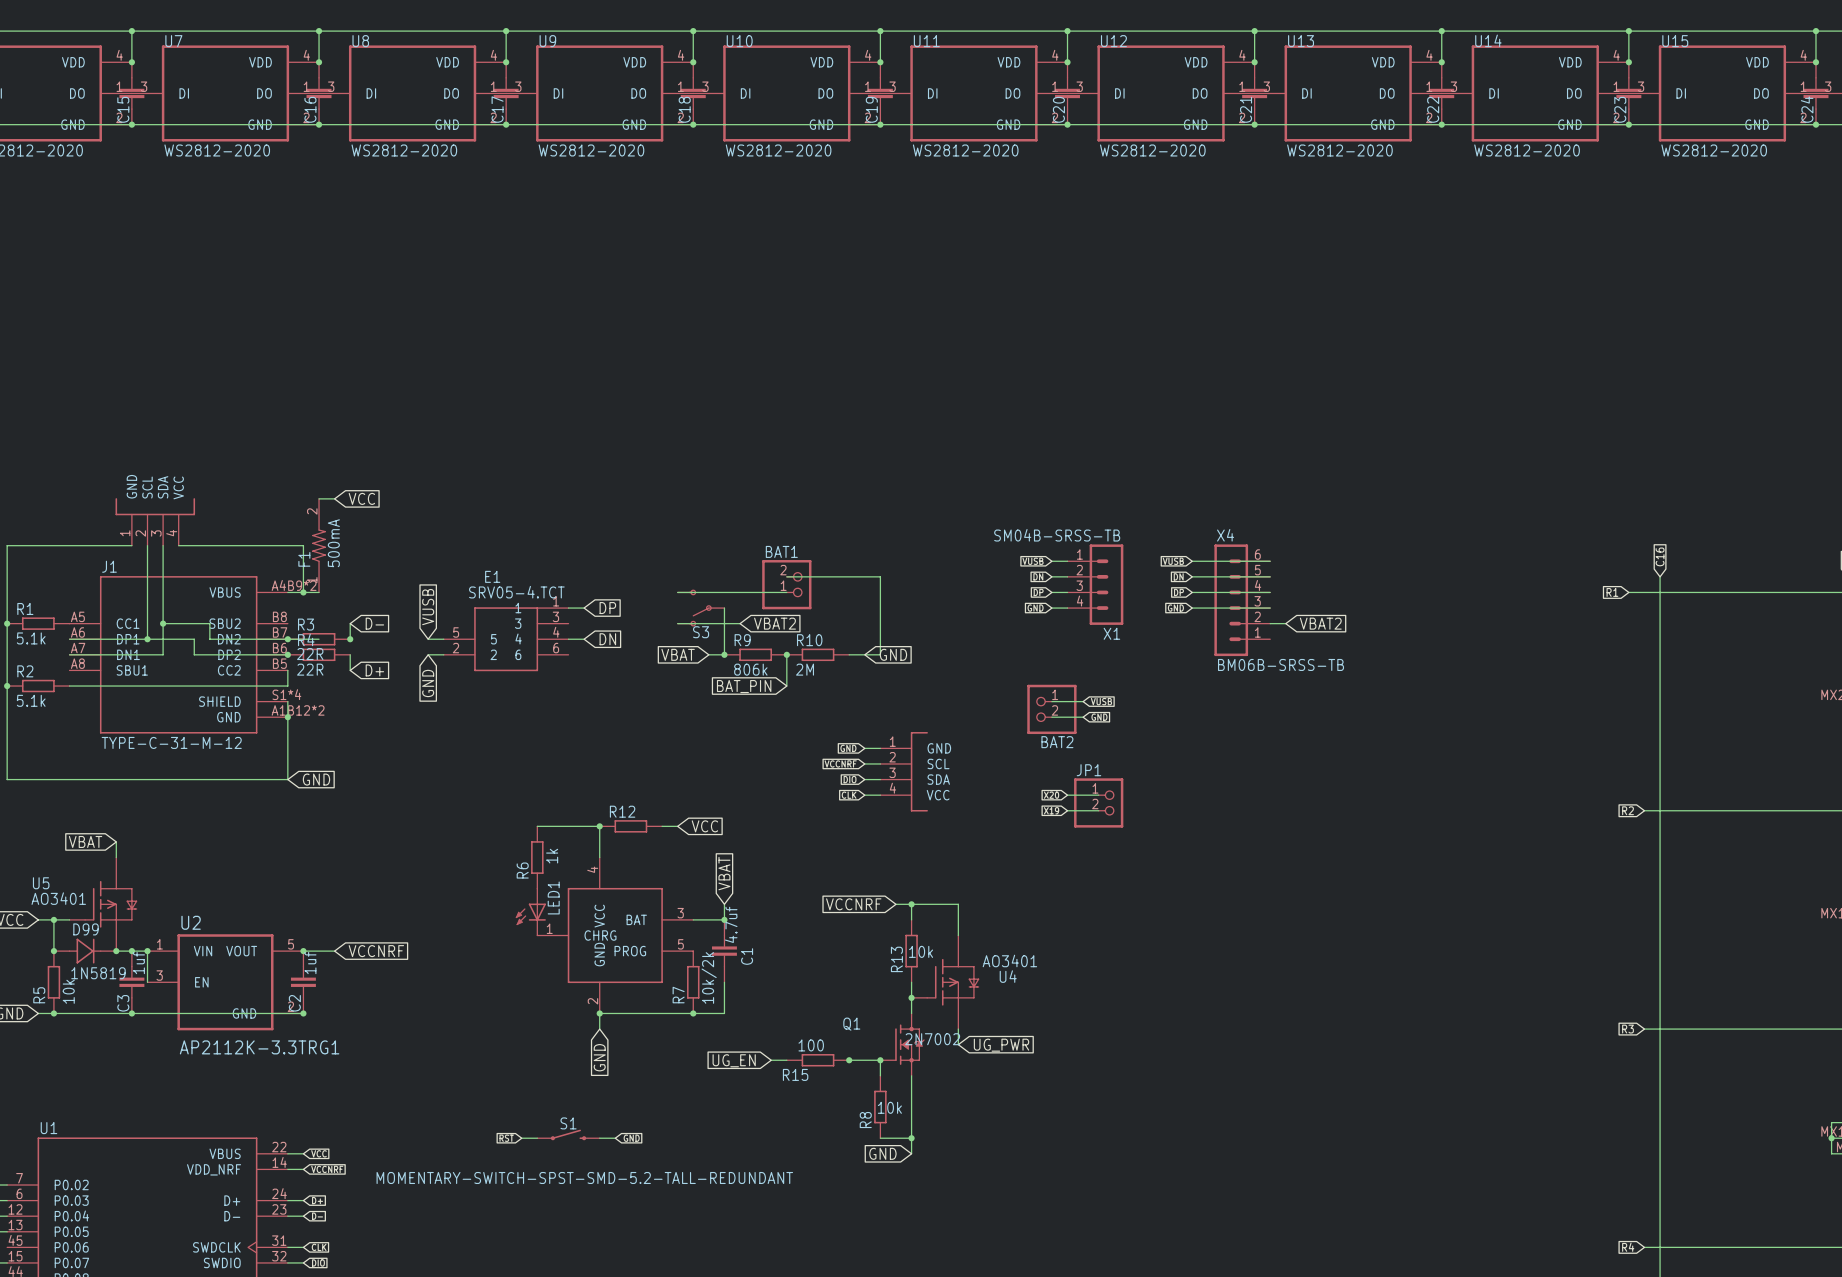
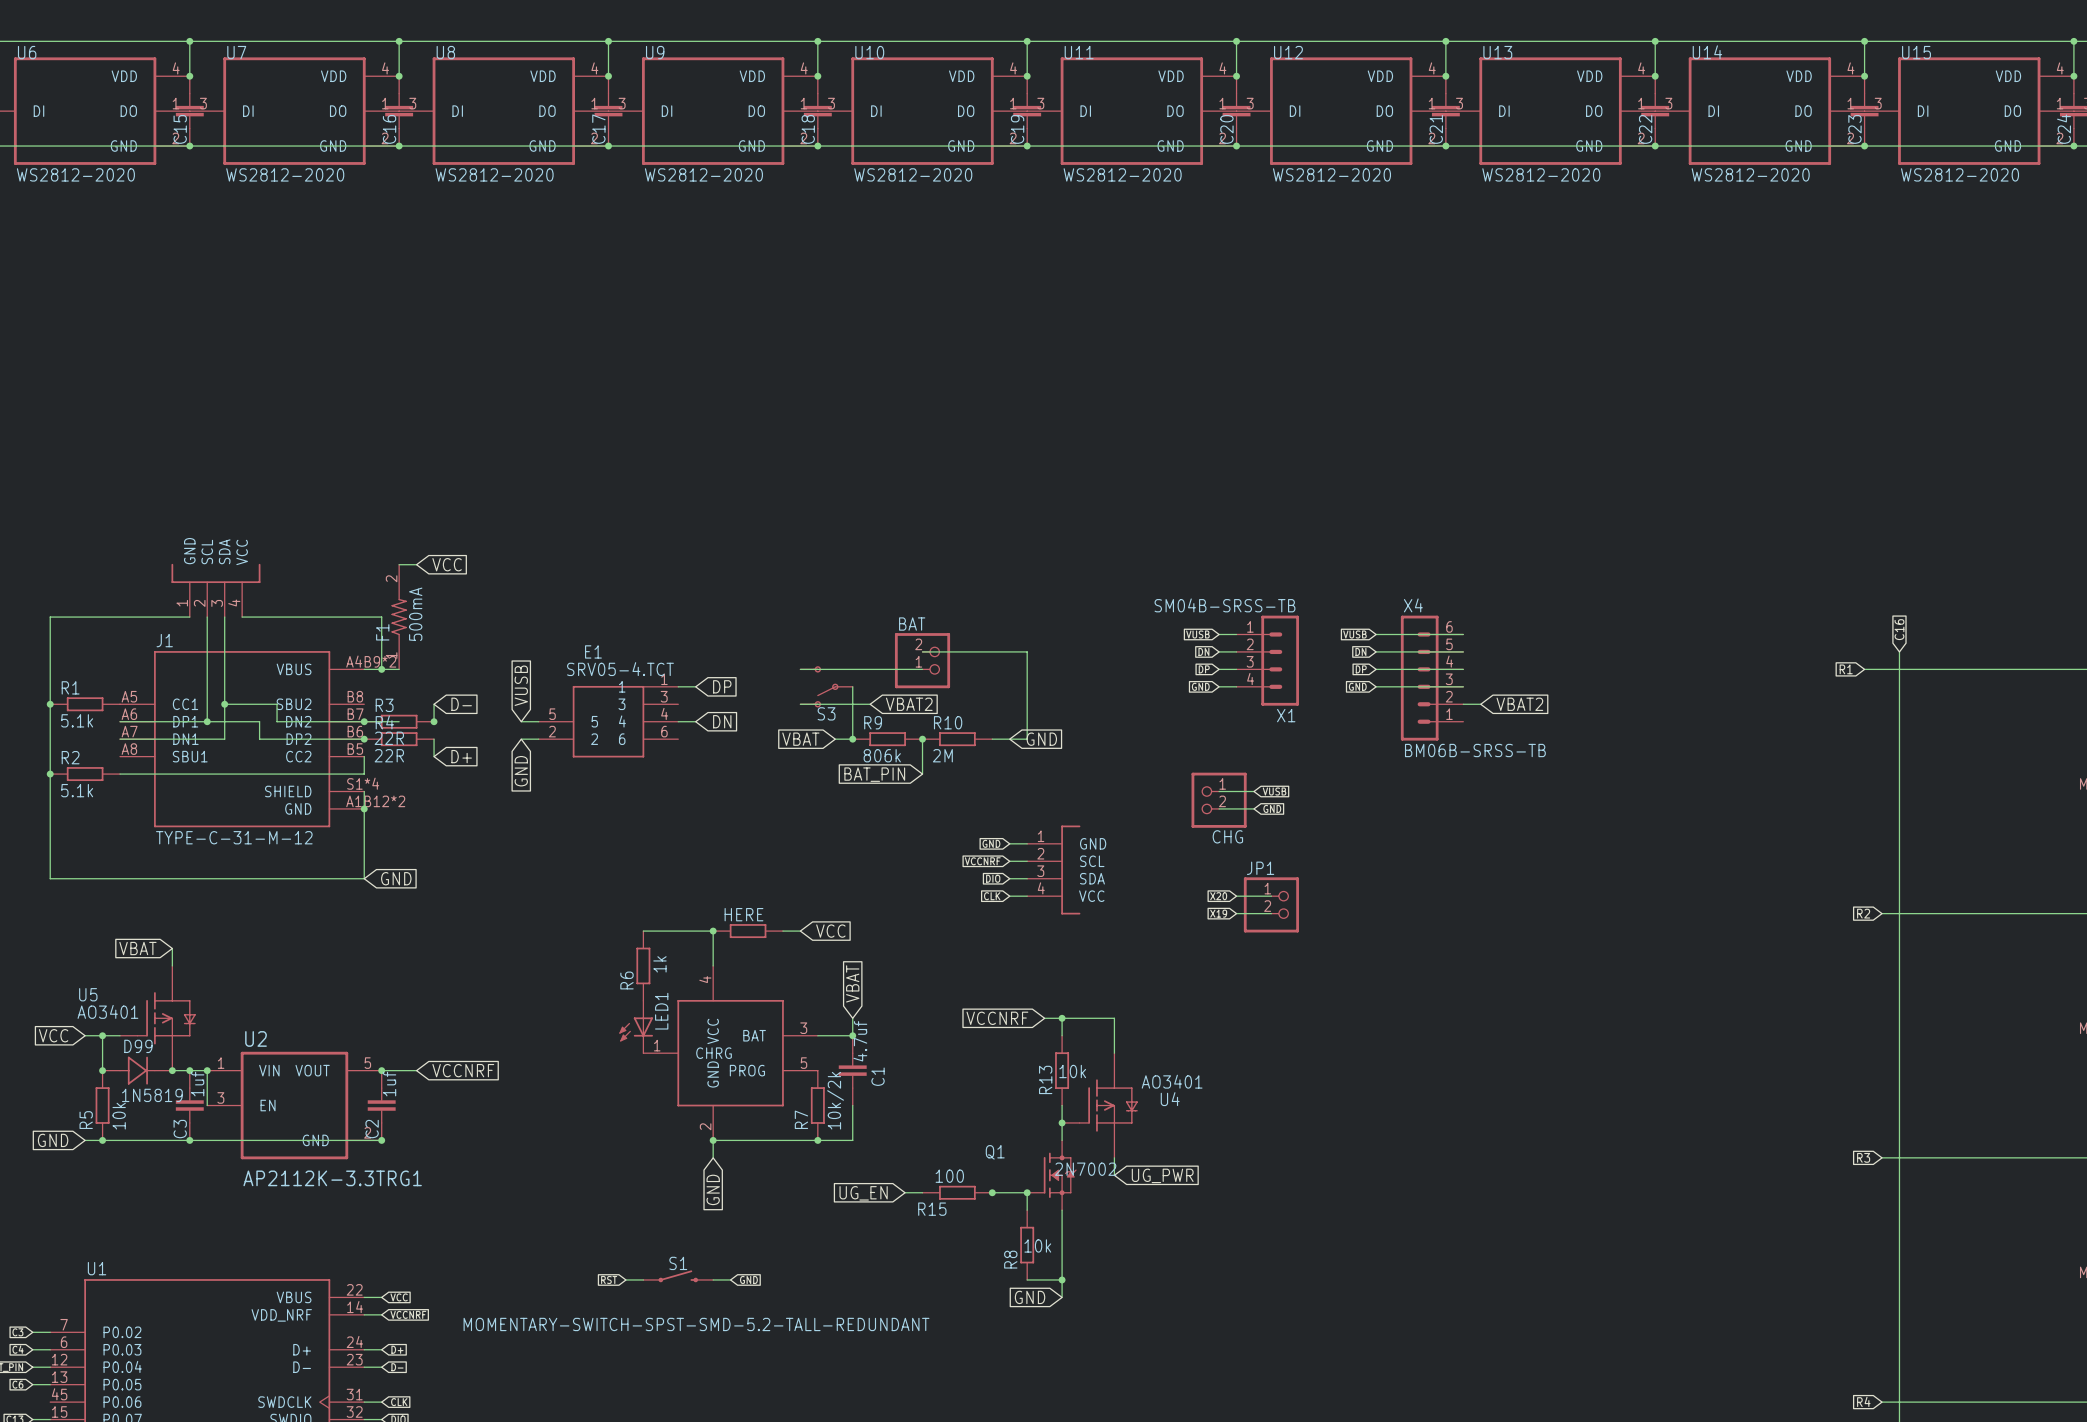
BAT1 name: BAT1 (781, 551) -> BAT (912, 624)
BAT2 name: BAT2 (1057, 742) -> CHG (1227, 836)
R12 name: R12 (622, 811) -> HERE (743, 914)

